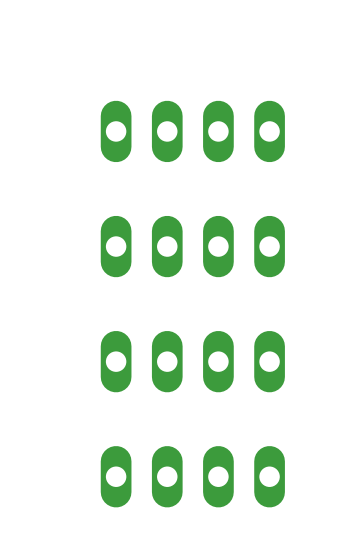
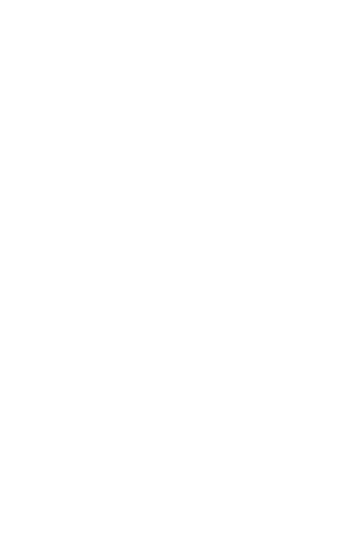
part: (192, 131) -> none
part: (192, 246) -> none
part: (192, 361) -> none
part: (192, 476) -> none

